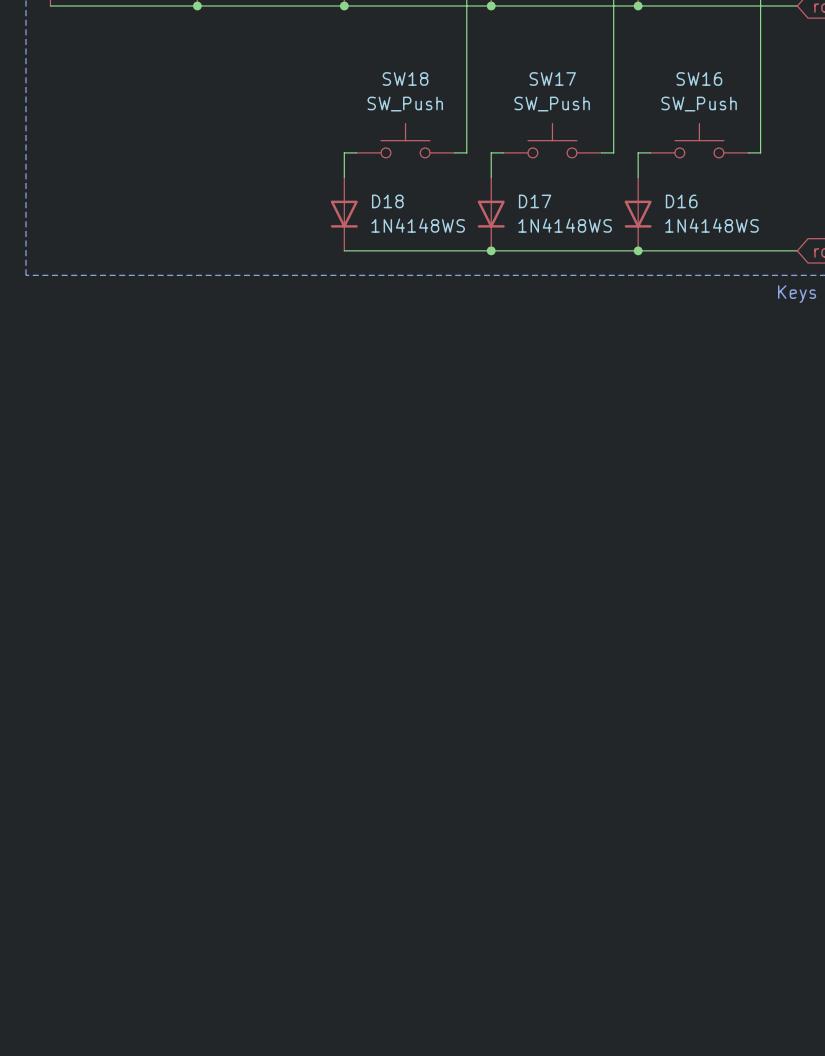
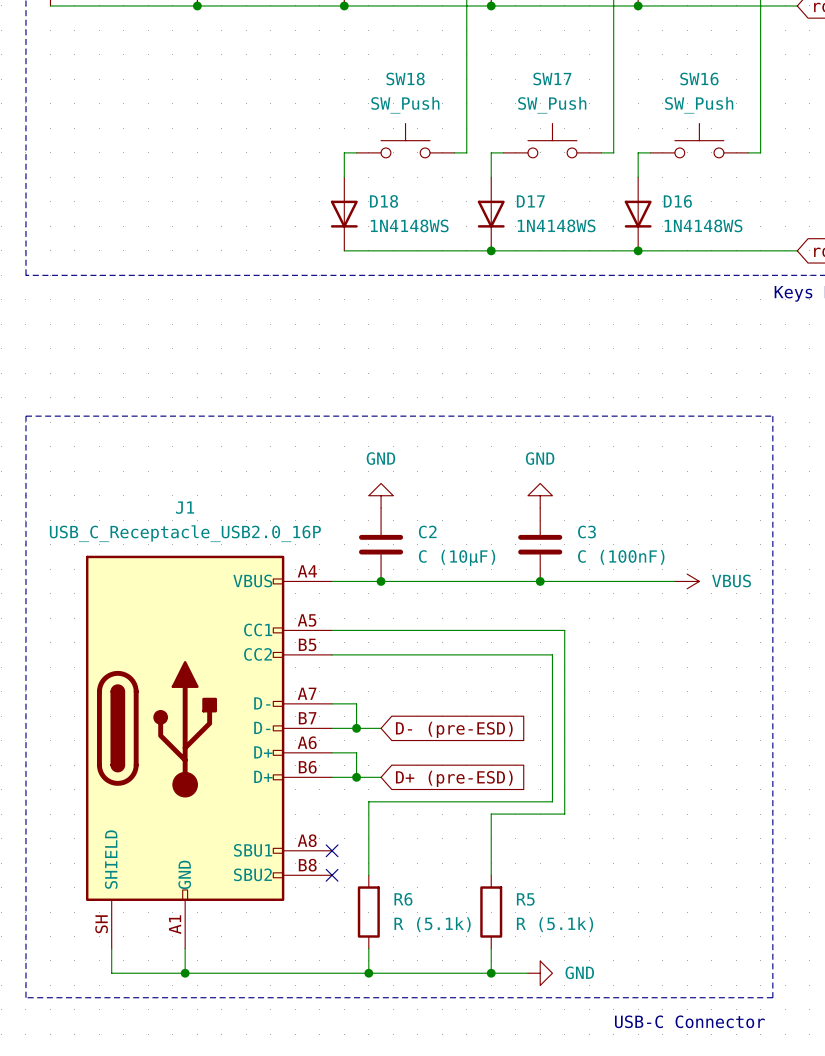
line: none -> (25, 416) (772, 416) (772, 997) (25, 997) (25, 416)
power symbol: none -> GND (381, 495)
power symbol: none -> GND (540, 495)
C2: none -> C (10µF) (381, 544)
C3: none -> C (100nF) (540, 544)
wire: none -> (332, 581) (674, 581)
junction: none -> (381, 581)
junction: none -> (540, 581)
power symbol: none -> VBUS (687, 581)
wire: none -> (332, 630) (564, 630) (564, 814) (491, 814) (491, 875)
wire: none -> (332, 654) (552, 654) (552, 801) (368, 801) (368, 875)
wire: none -> (332, 703) (356, 703) (356, 728)
wire: none -> (332, 728) (381, 728)
junction: none -> (356, 728)
global label: none -> D- (pre-ESD) (454, 729)
J1: none -> USB_C_Receptacle_USB2.0_16P (209, 752)
wire: none -> (332, 752) (356, 752) (356, 777)
wire: none -> (332, 777) (381, 777)
junction: none -> (356, 777)
global label: none -> D+ (pre-ESD) (454, 778)
no-connect mark: none -> (332, 850)
no-connect mark: none -> (332, 875)
R6: none -> R (5.1k) (368, 912)
R5: none -> R (5.1k) (491, 912)
wire: none -> (111, 948) (111, 973) (527, 973)
wire: none -> (185, 948) (185, 973)
wire: none -> (368, 948) (368, 973)
wire: none -> (491, 948) (491, 973)
junction: none -> (185, 973)
junction: none -> (368, 973)
junction: none -> (491, 973)
power symbol: none -> GND (540, 973)
text: none -> USB-C Connector (689, 1021)

